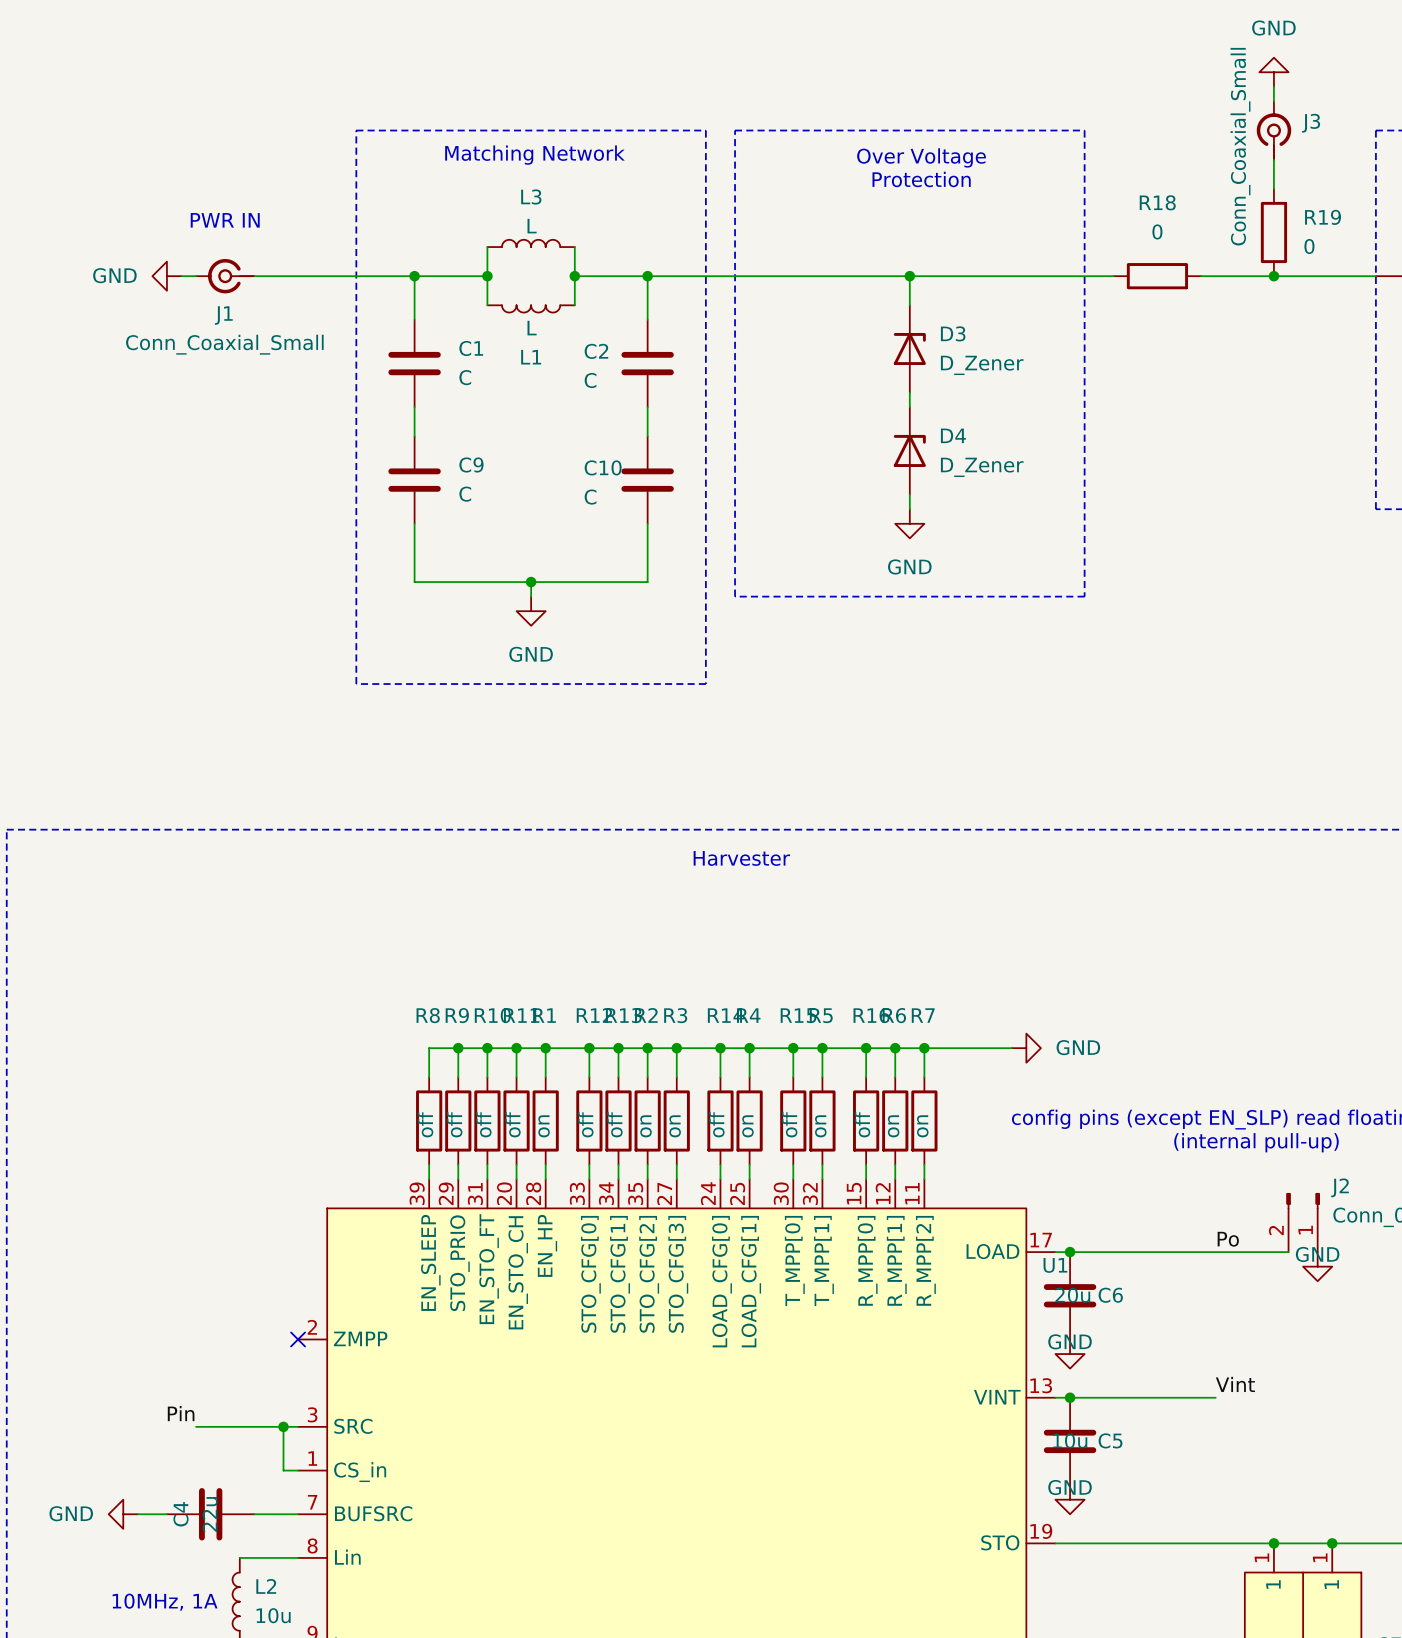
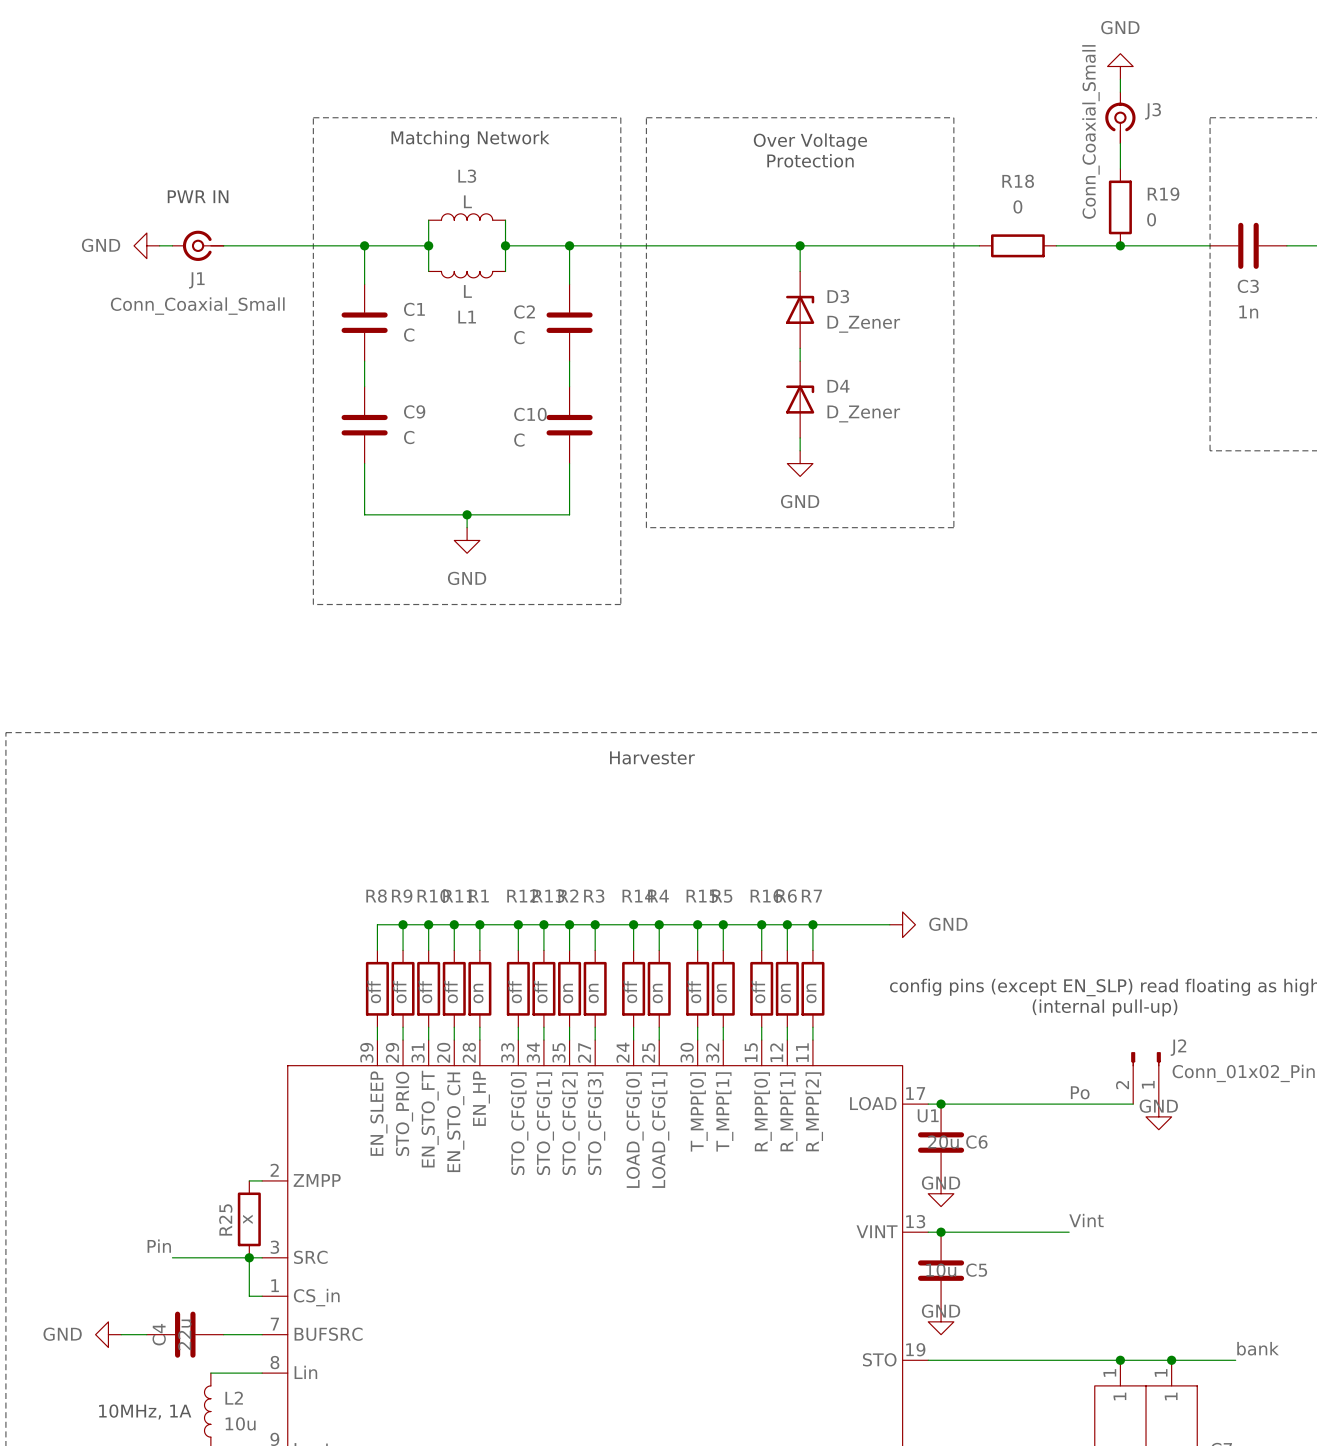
wire: none -> (249, 1180) (262, 1180)
no-connect mark: (298, 1339) -> none
R25: none -> x (249, 1219)

